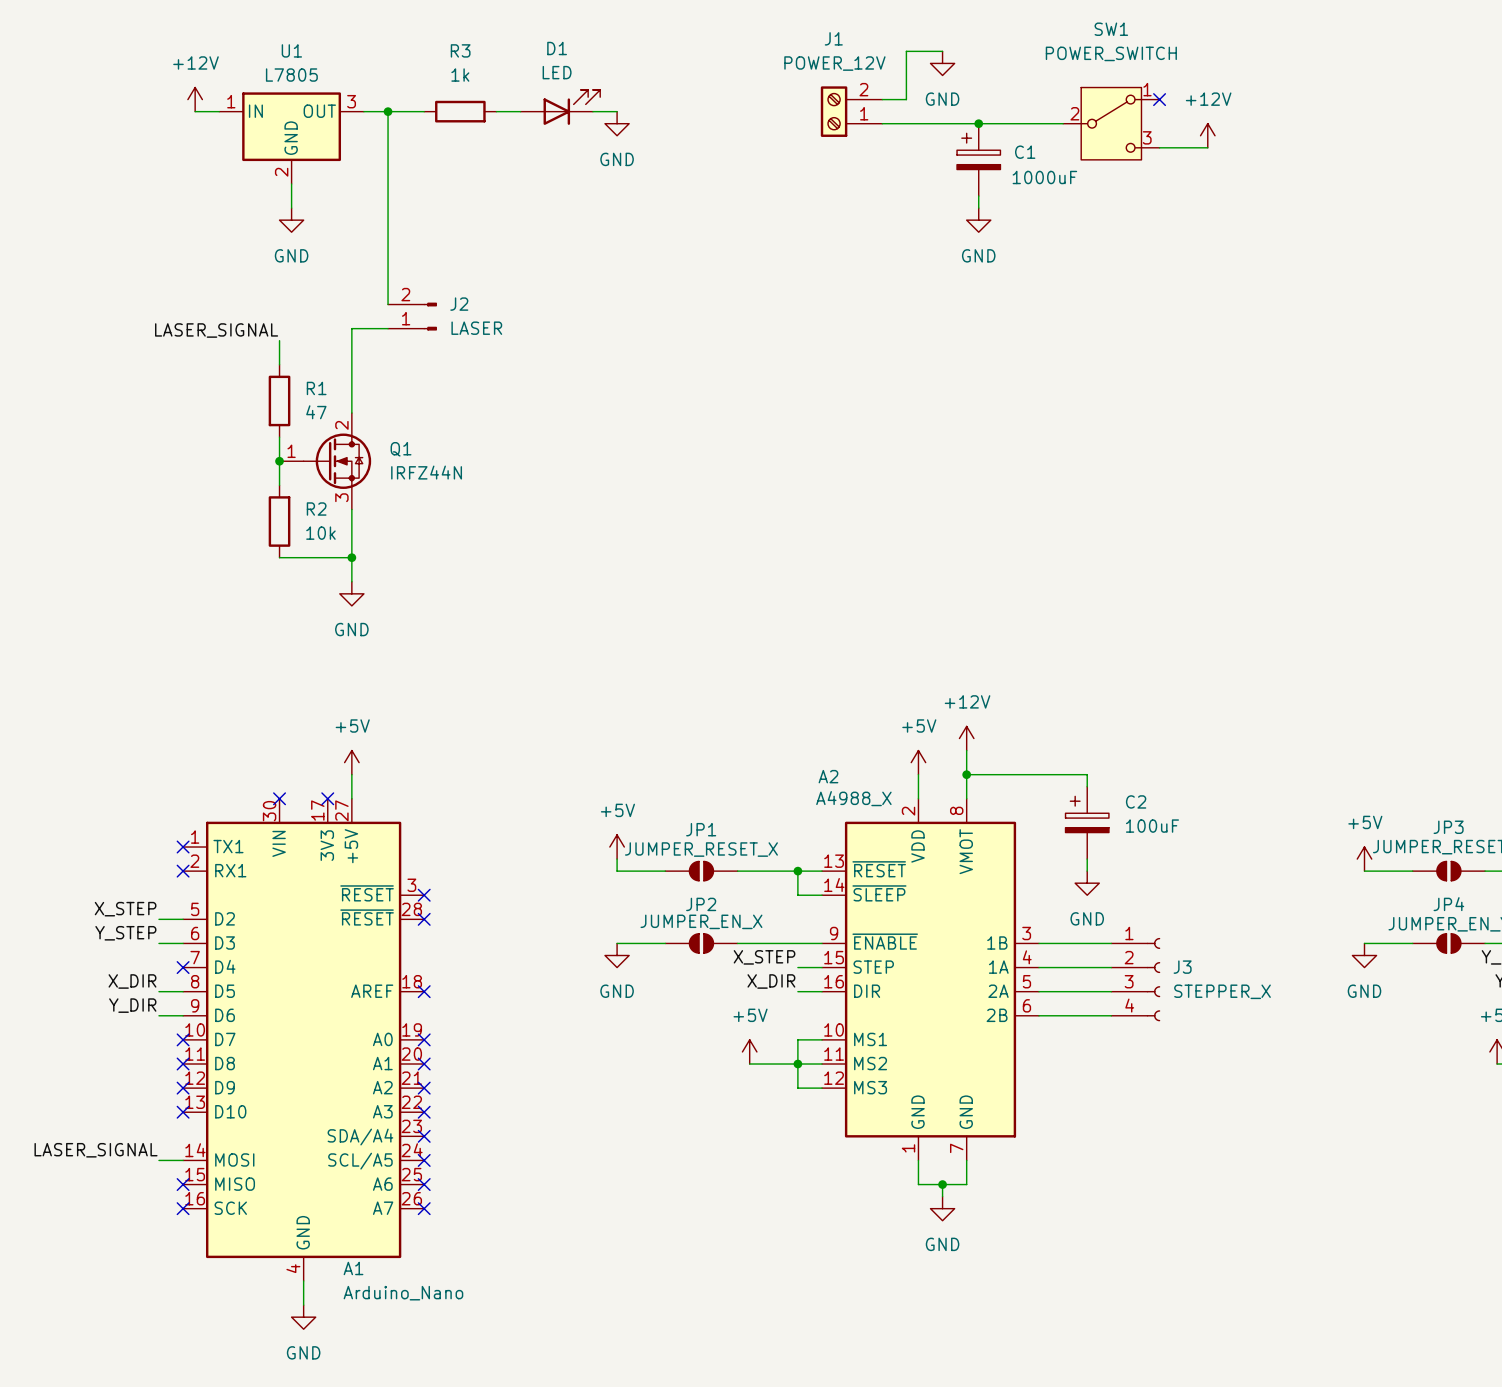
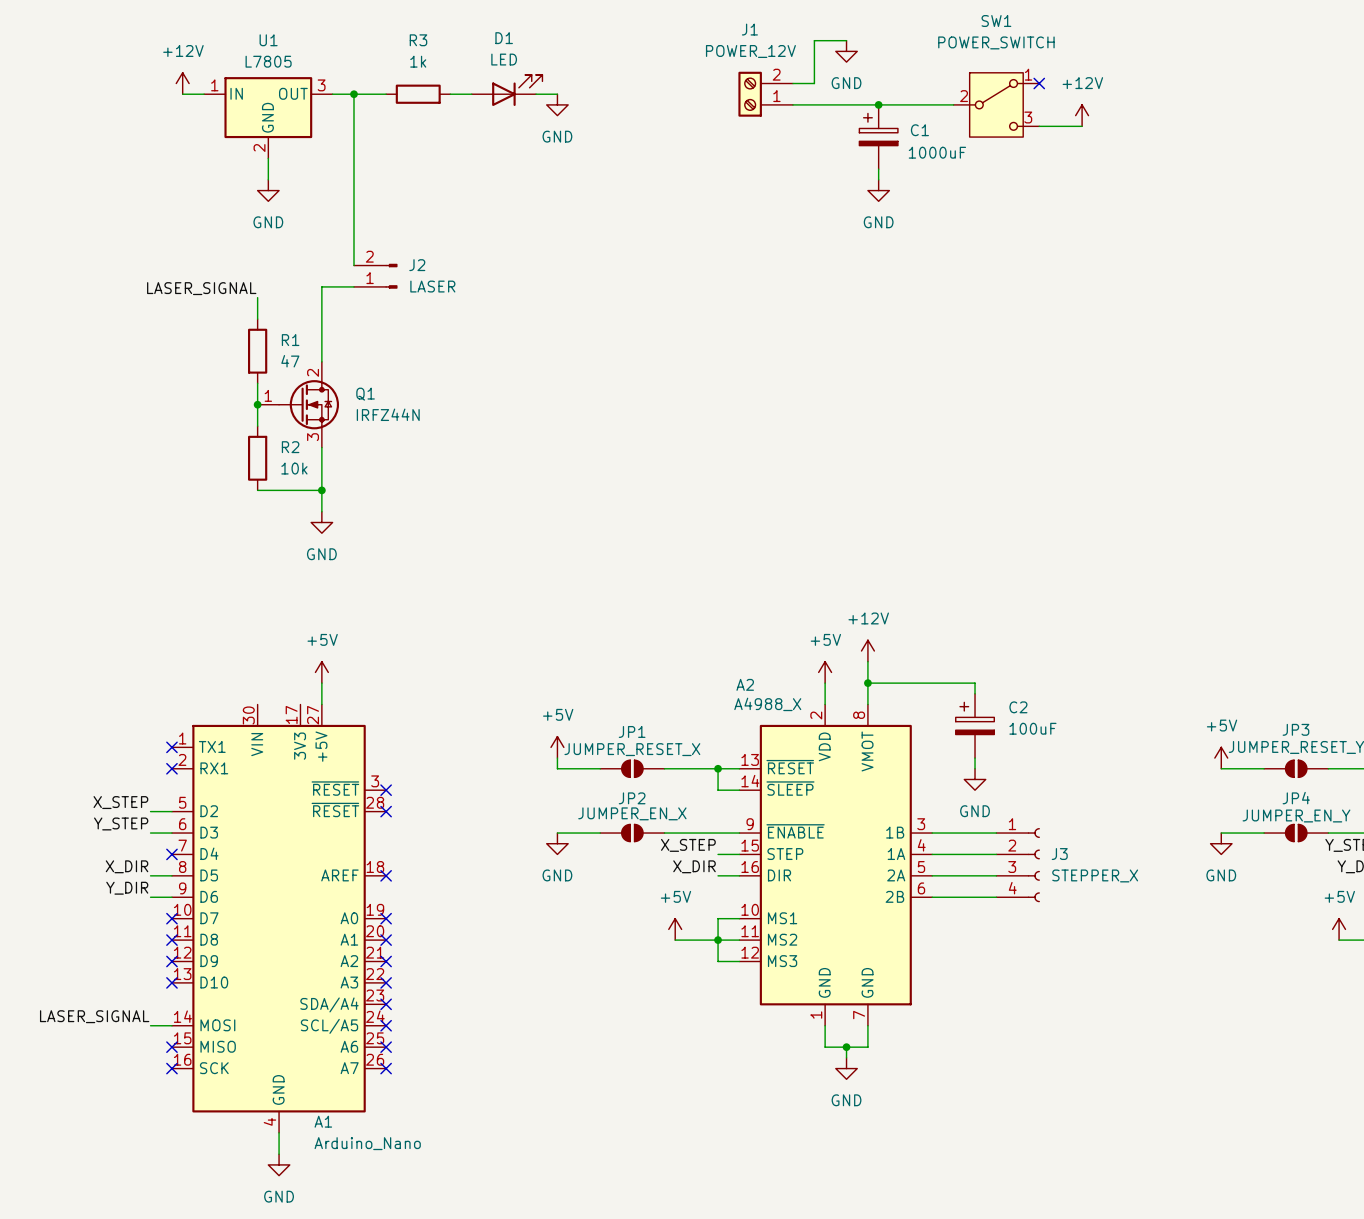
no-connect mark: (279, 798) -> none
no-connect mark: (327, 798) -> none

